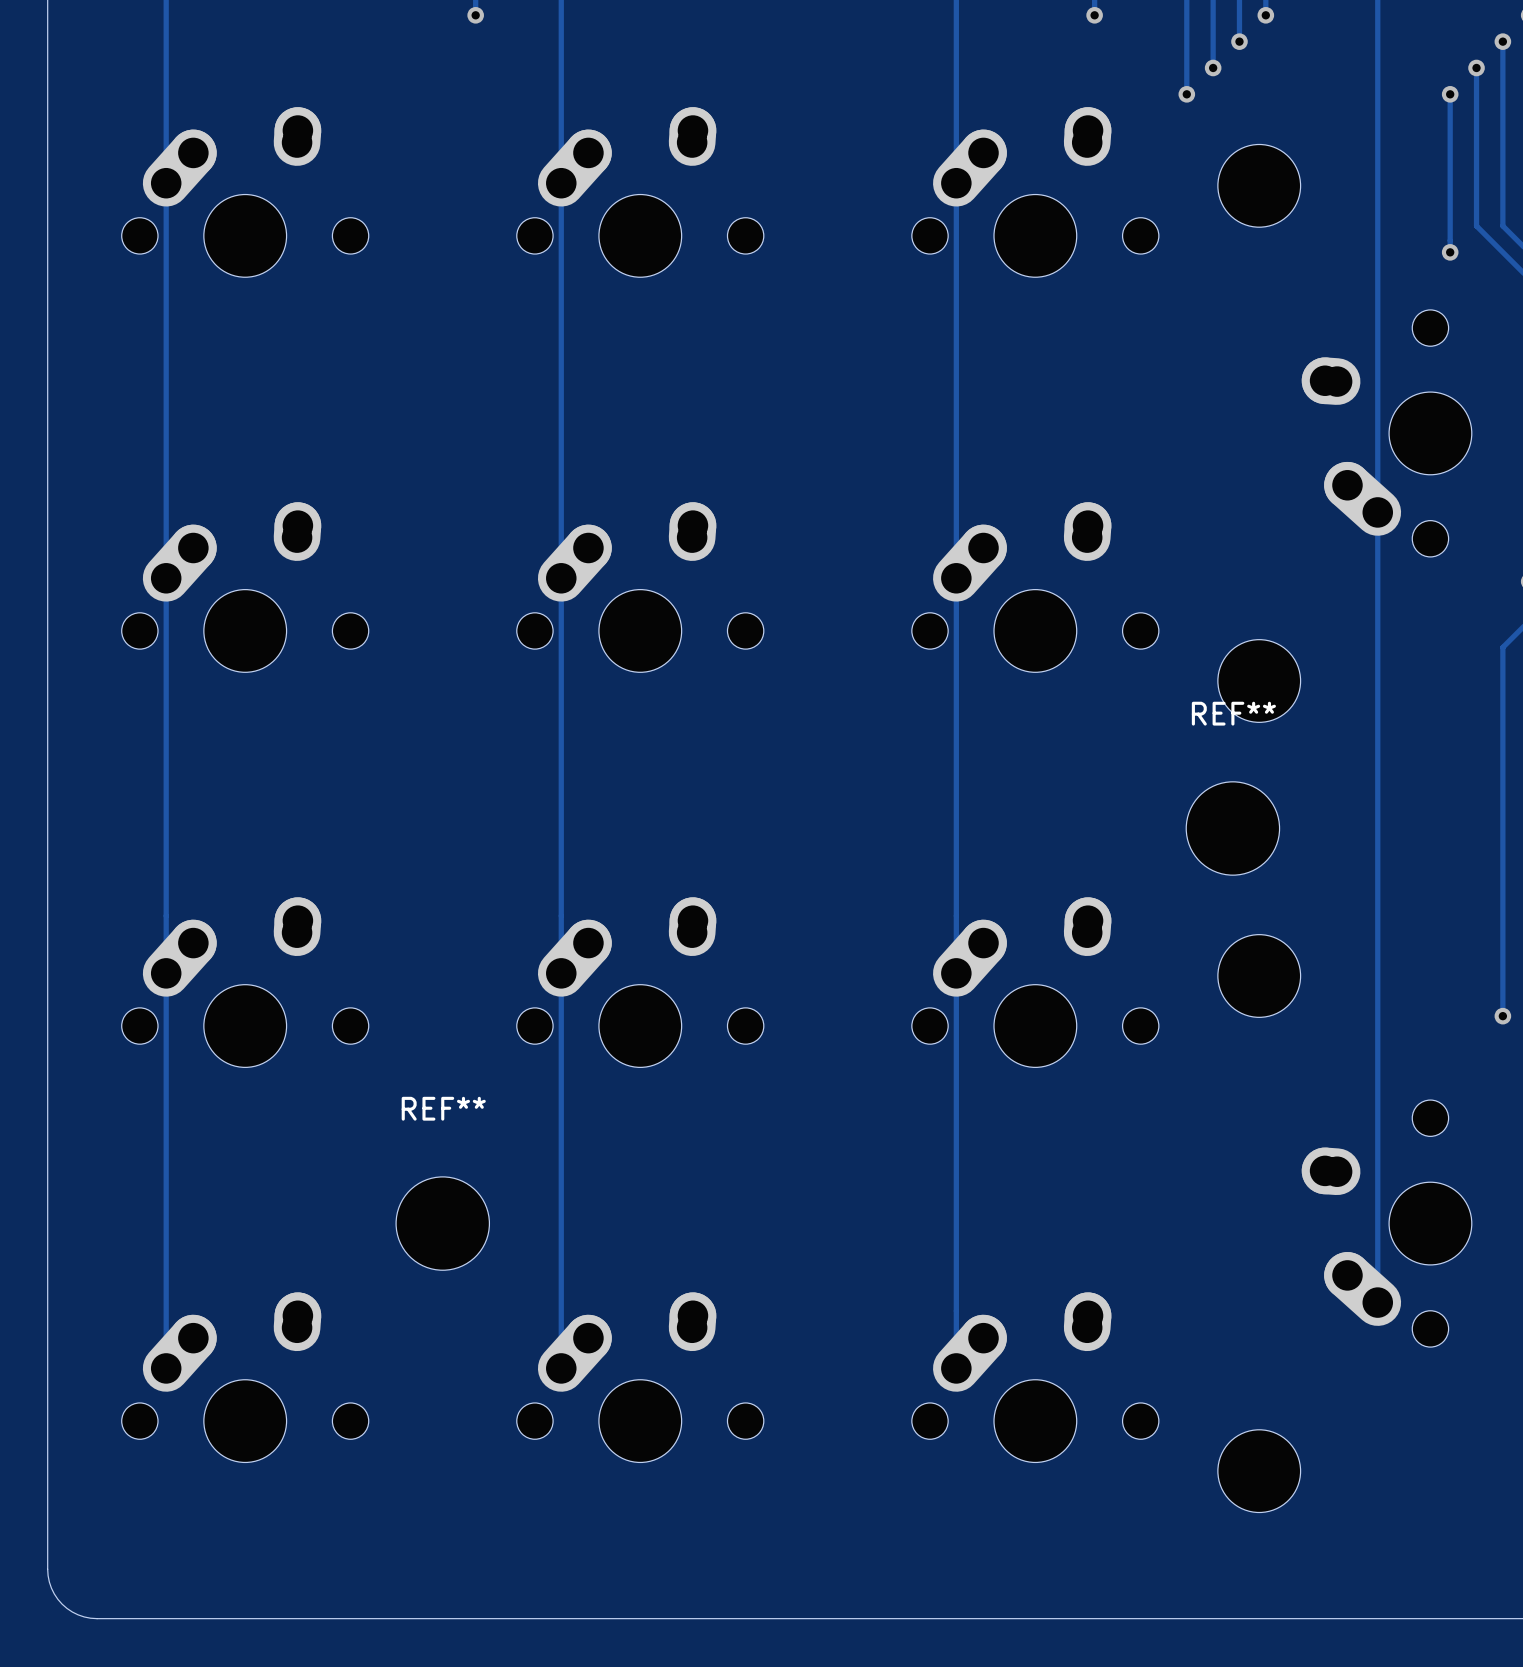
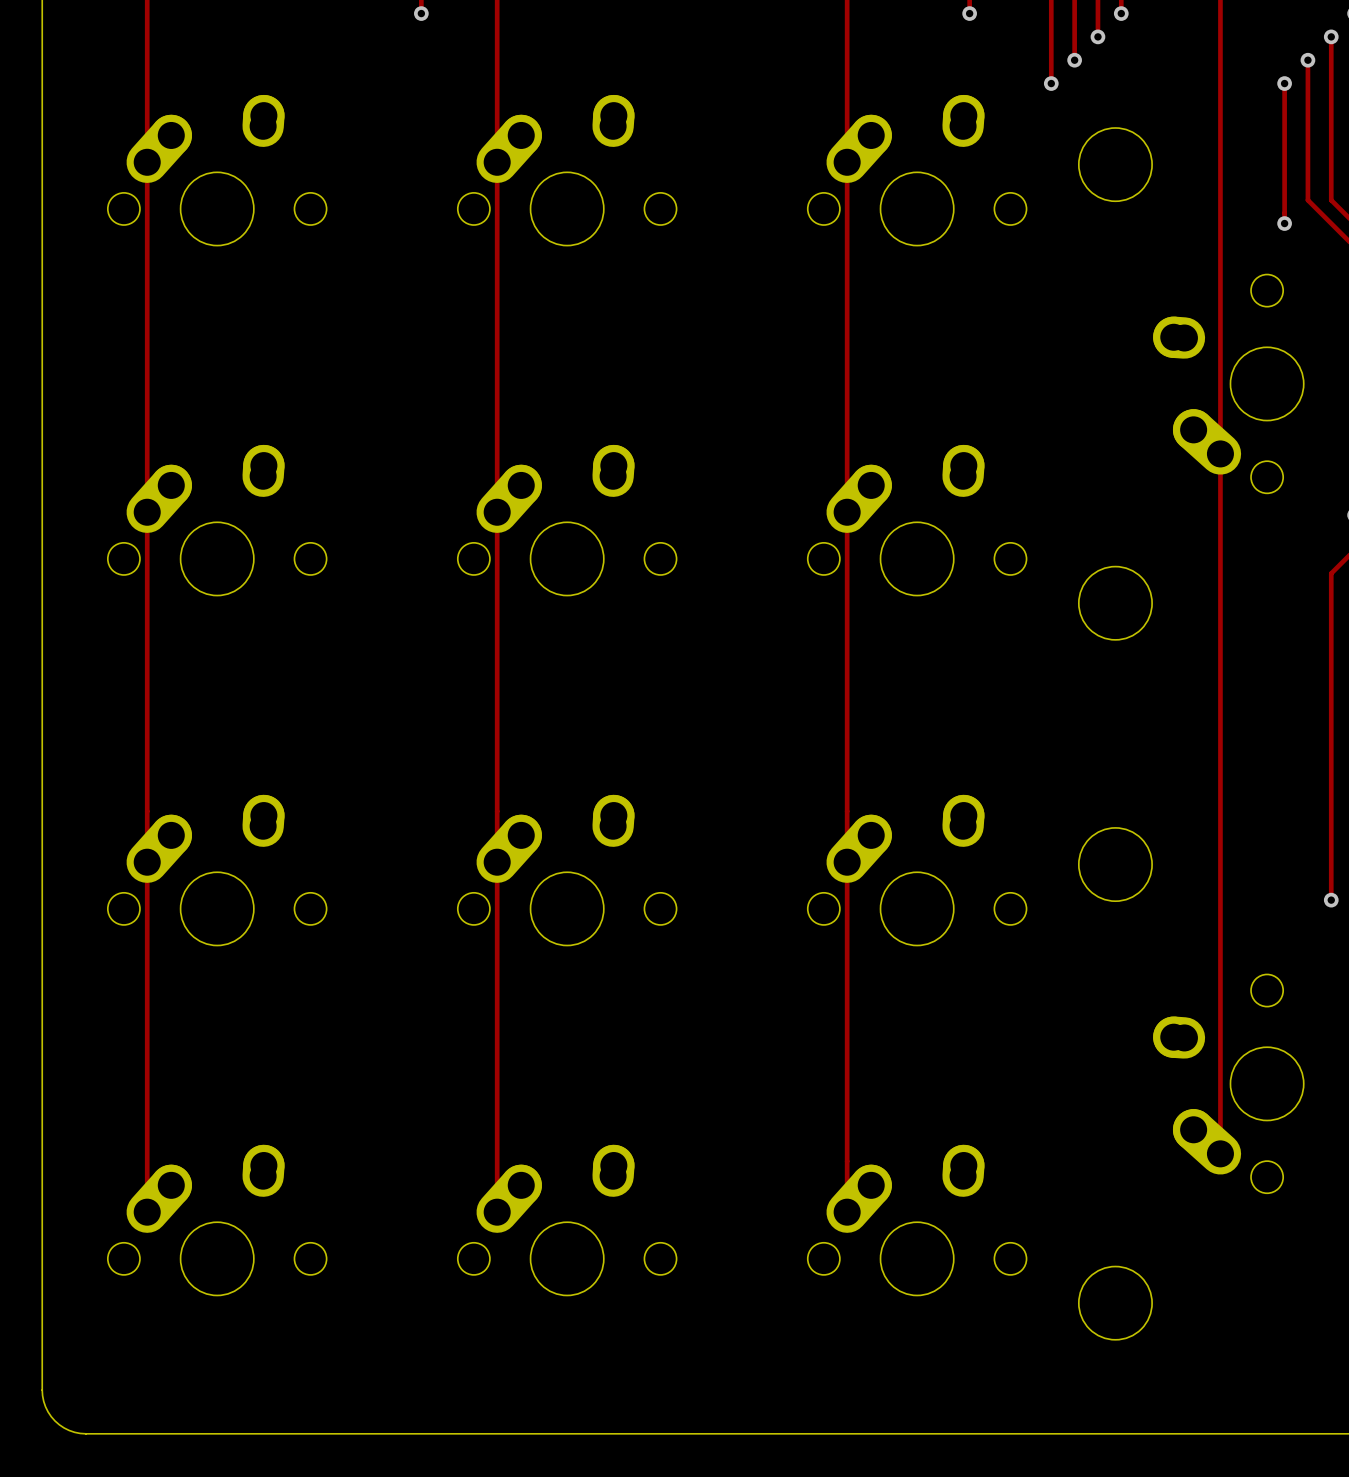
REF**: (1232, 828) -> none
REF**: (442, 1223) -> none

